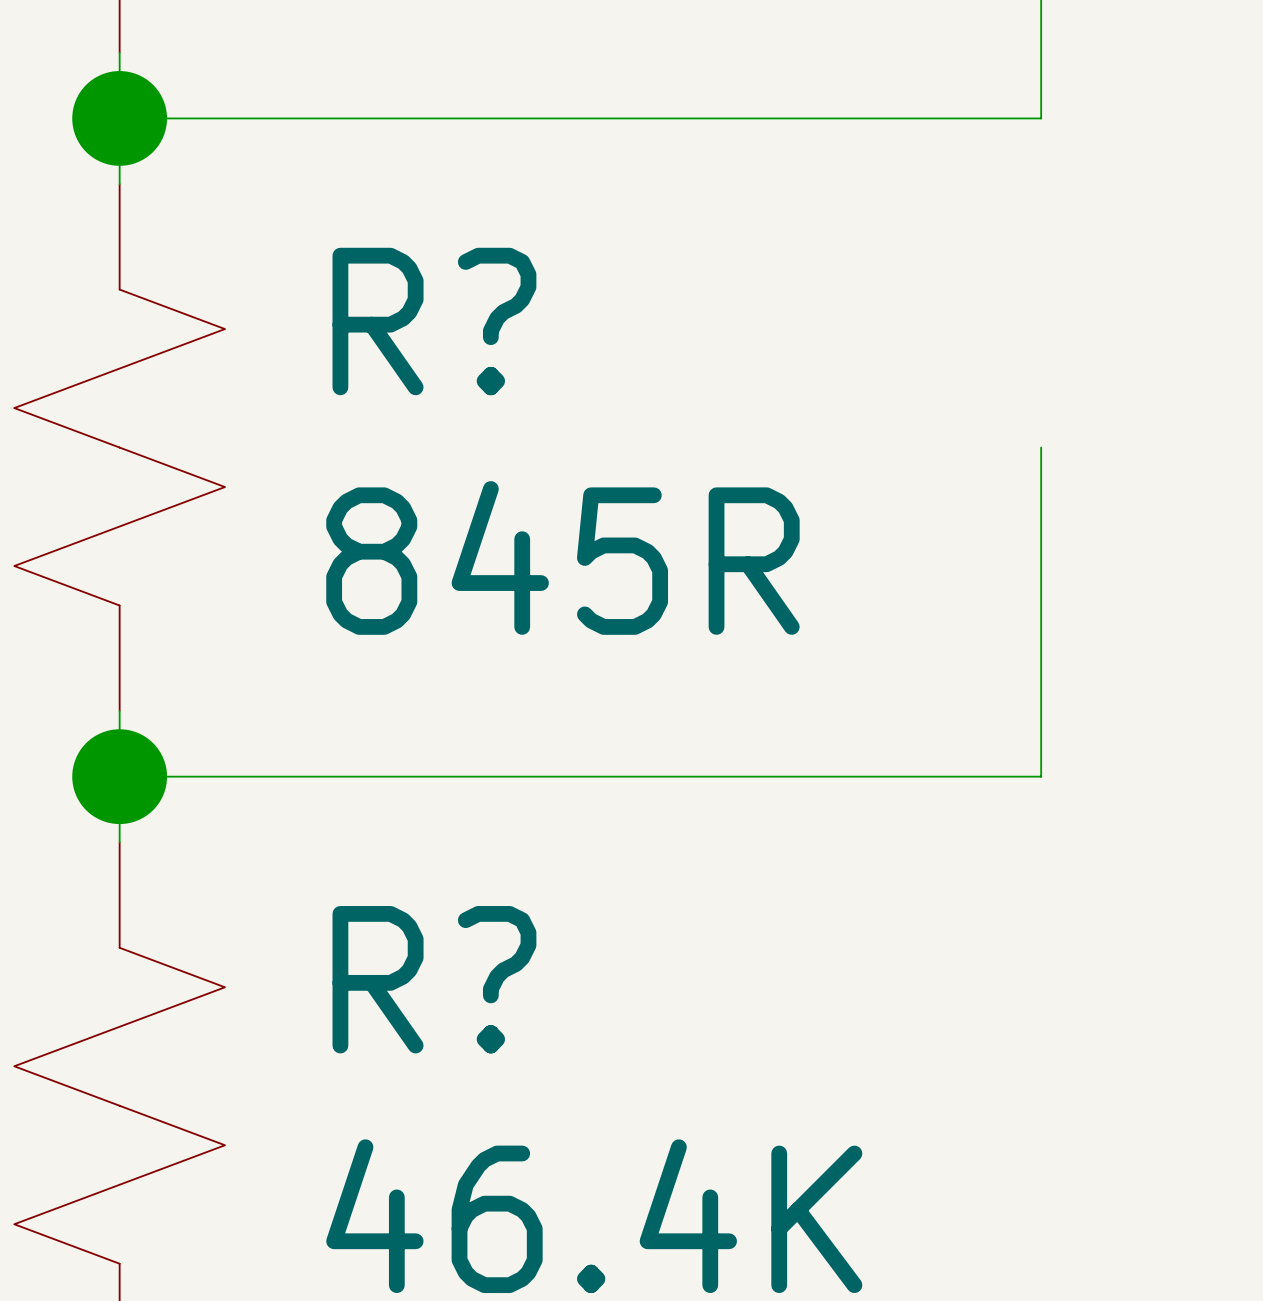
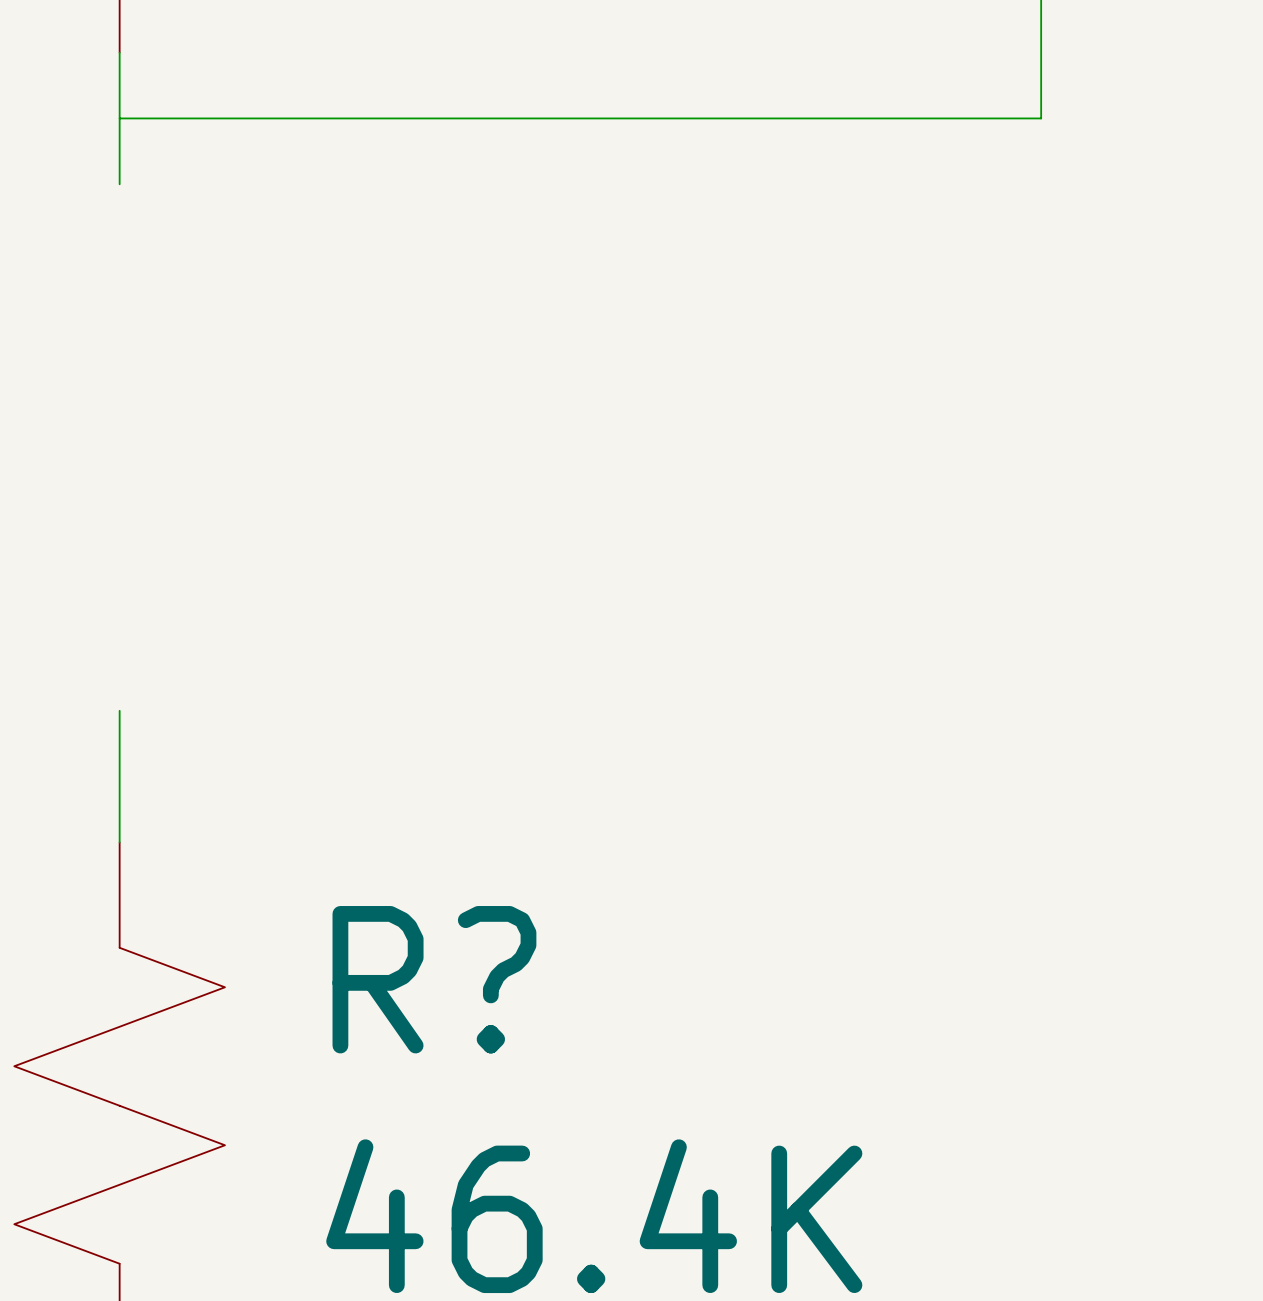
junction: (119, 118) -> none
R?: 845R (119, 447) -> none
wire: (1041, 447) (1041, 776) (119, 776) -> none
junction: (119, 776) -> none

